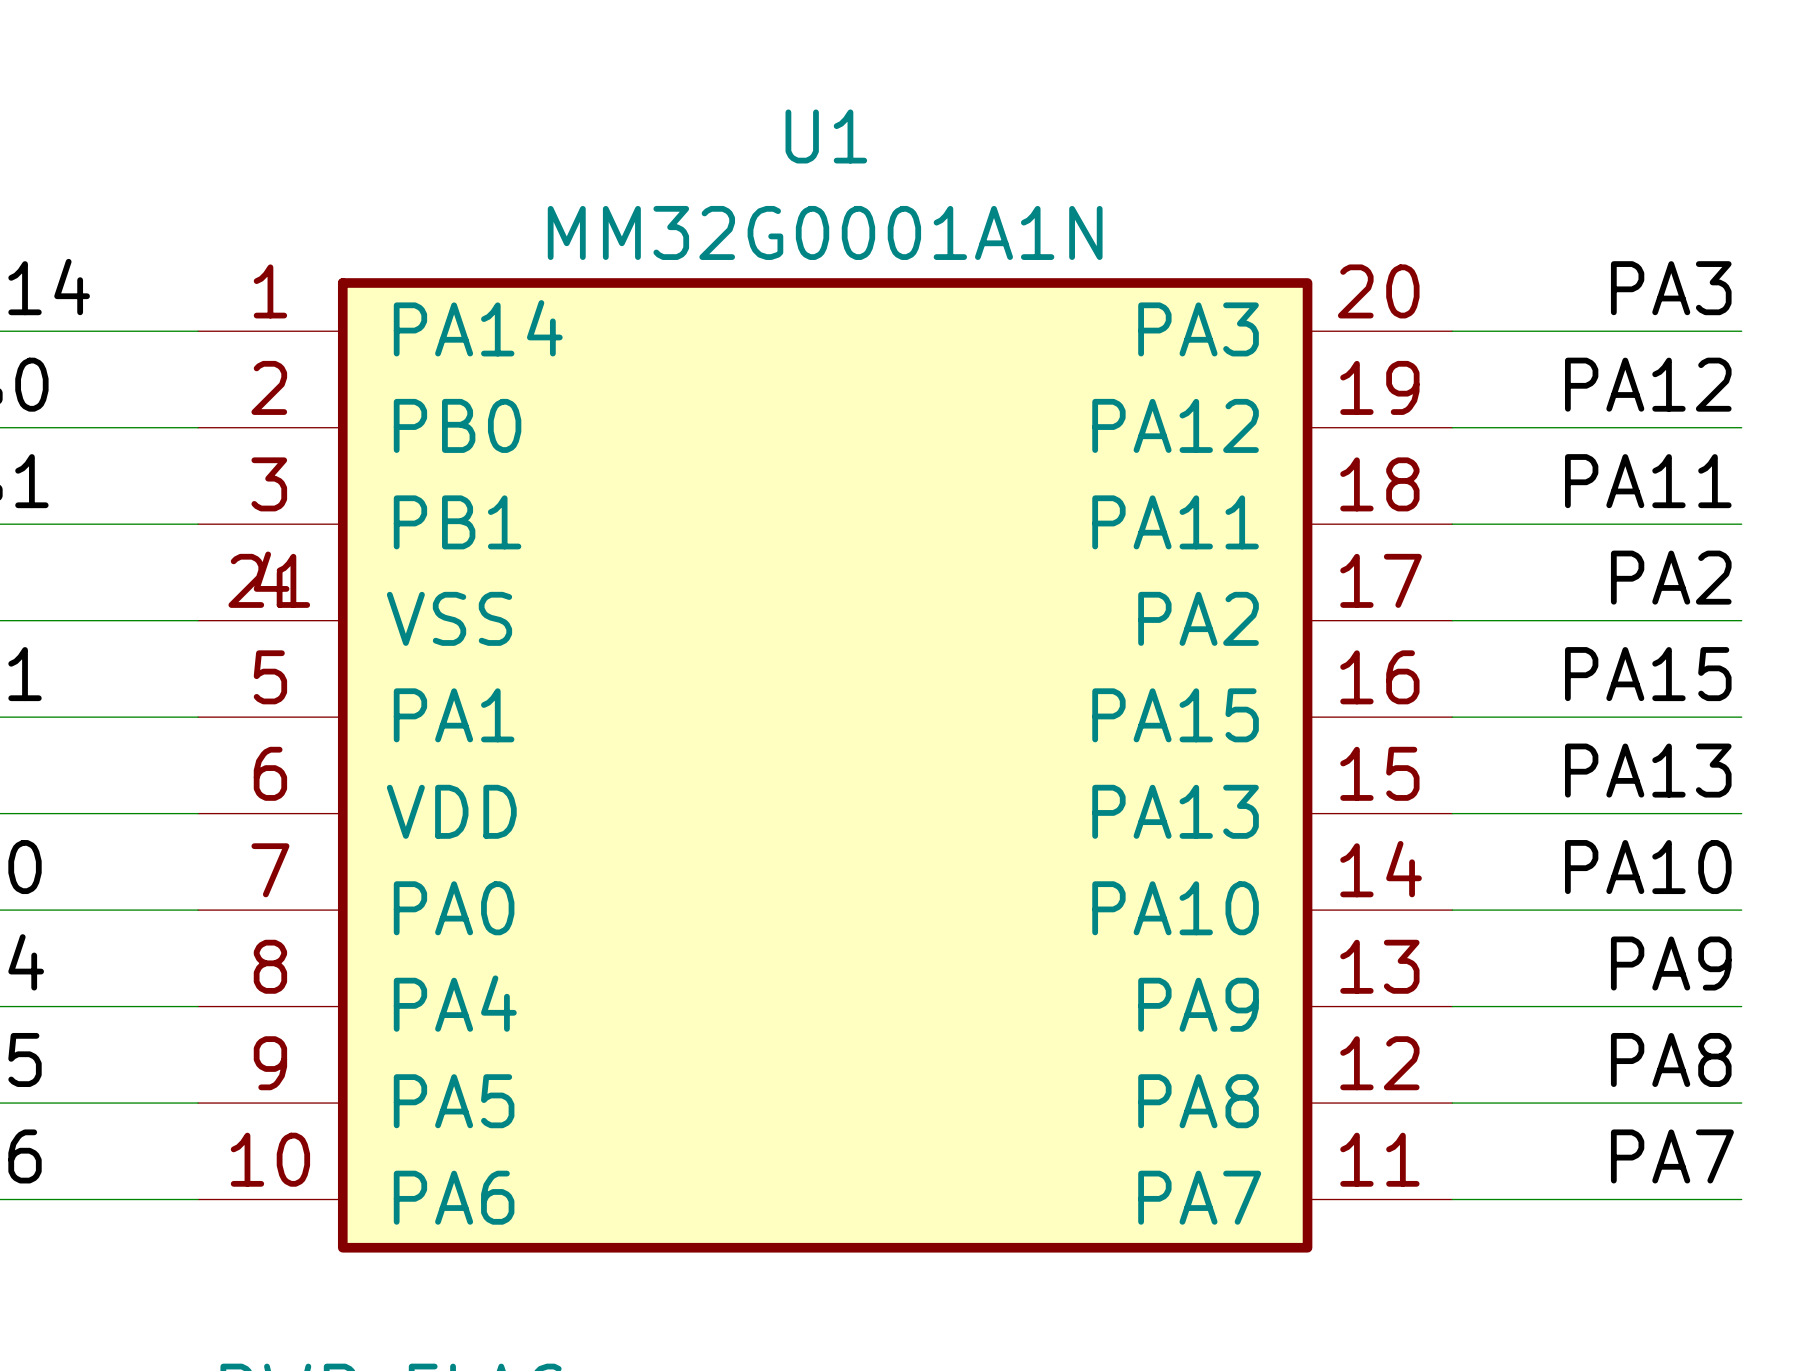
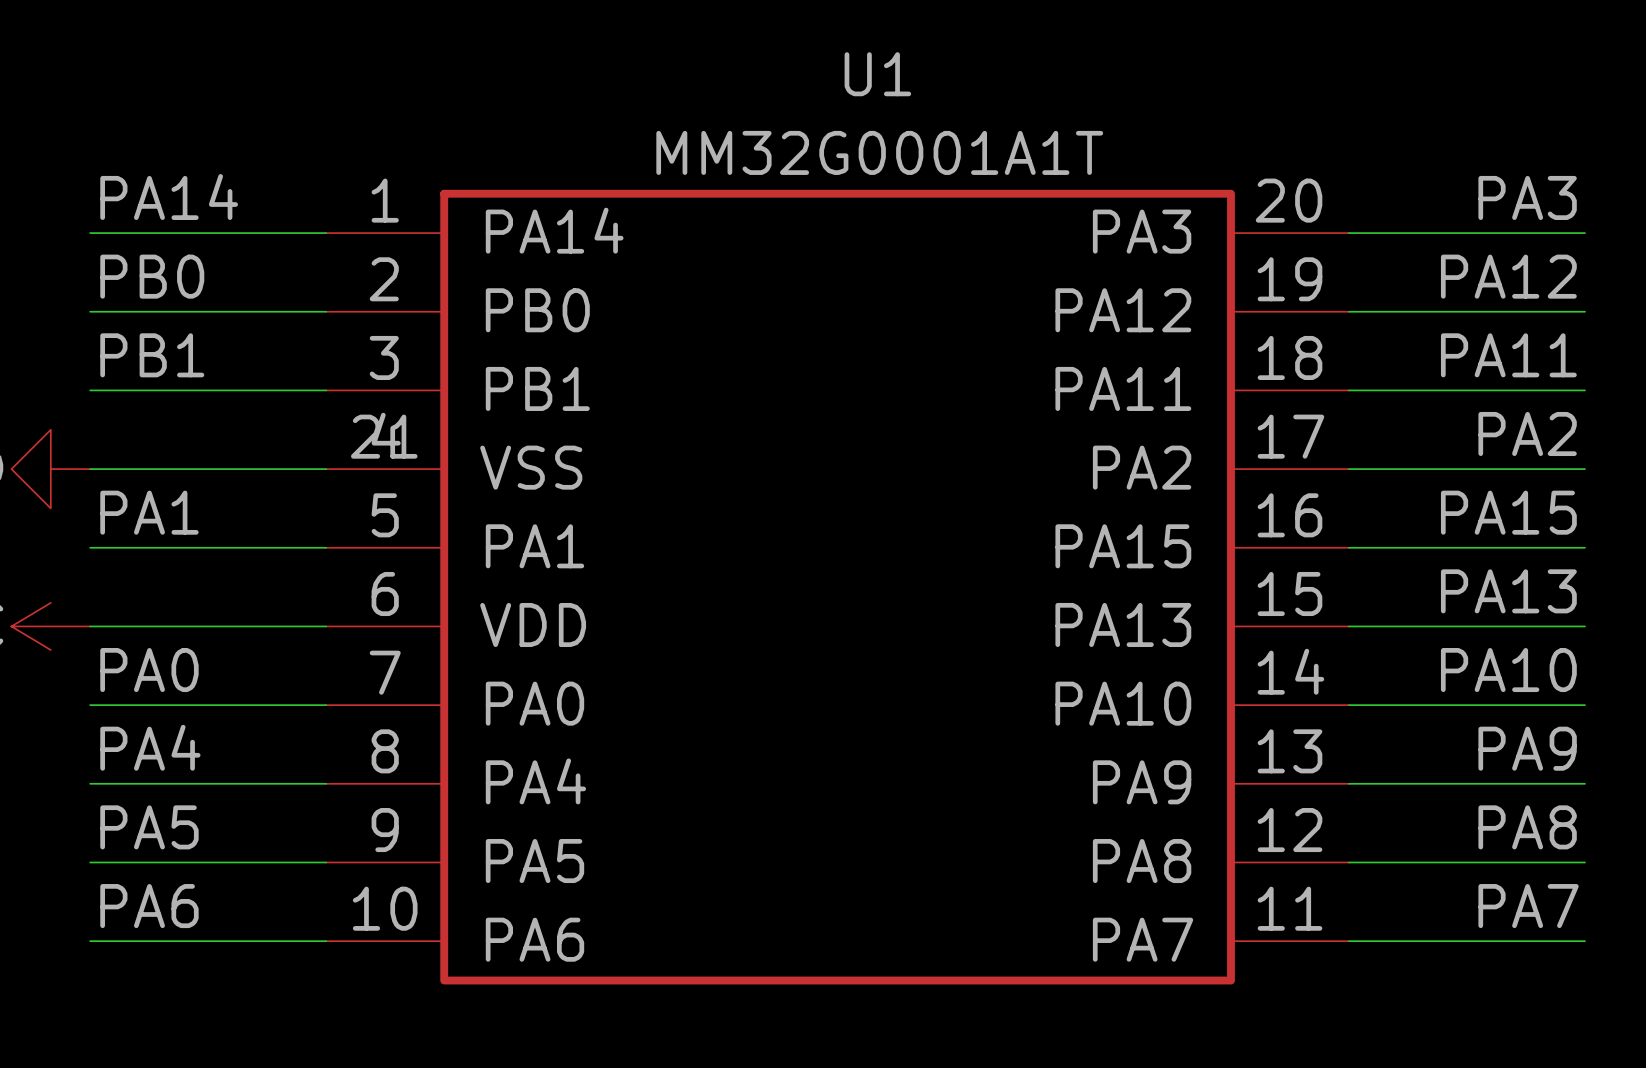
U1 name position: U1 (826, 136) -> U1 (877, 74)
U1 value: MM32G0001A1N (825, 232) -> MM32G0001A1T (879, 152)

